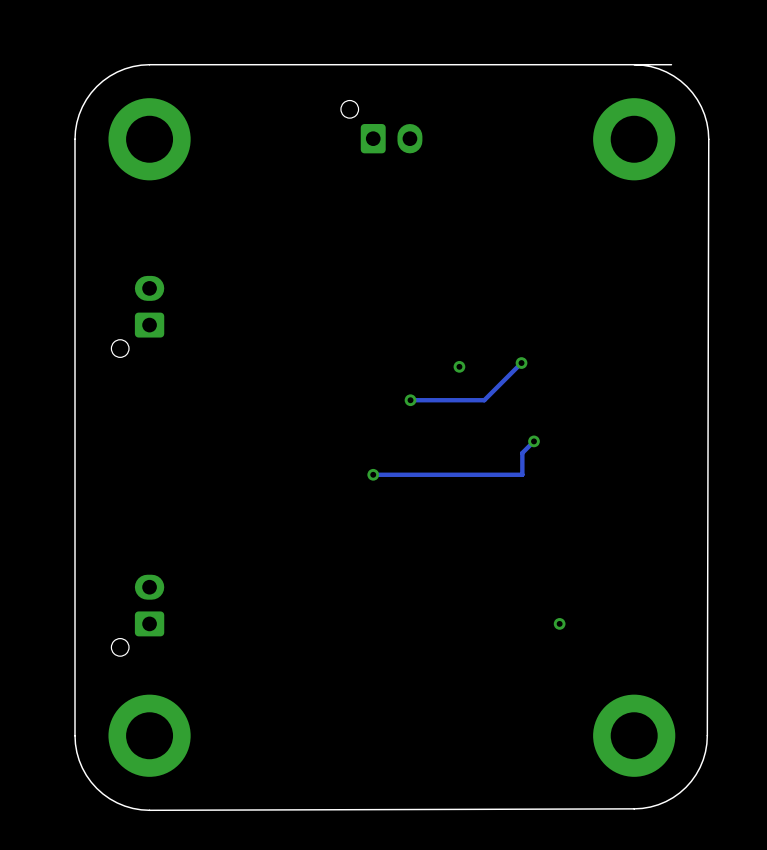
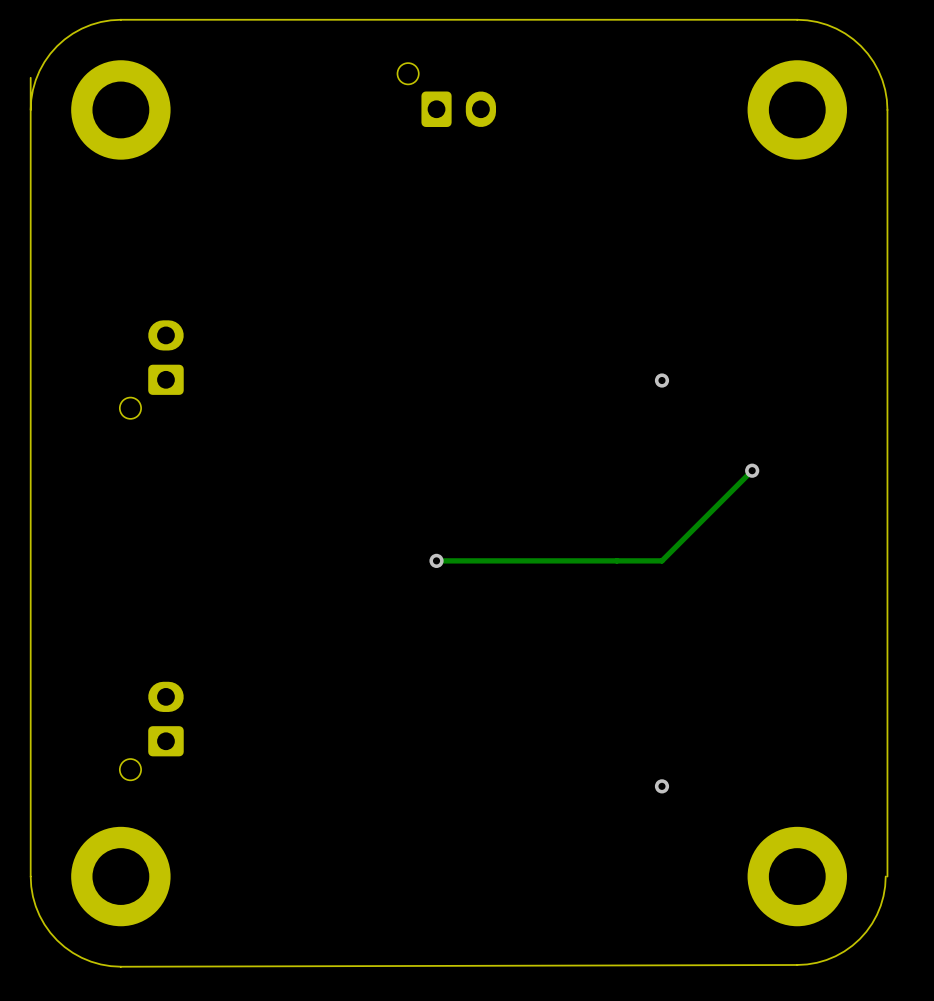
board edge: (671, 64) (149, 64) (132, 66) (117, 72) (103, 80) (91, 92) (79, 114) (75, 139) (75, 735) (76, 752) (82, 768) (91, 782) (103, 794) (124, 806) (149, 810) (634, 808) (650, 807) (665, 801) (679, 792) (691, 781) (703, 759) (707, 735) (708, 130) (701, 106) (692, 92) (680, 80) (658, 68) (642, 65) (634, 64) -> none
board edge: none -> (30, 77) (30, 876) (35, 906) (44, 924) (57, 940) (81, 957) (100, 964) (120, 966) (807, 964) (835, 956) (859, 939) (876, 914) (883, 896) (885, 876)
board edge: none -> (30, 109) (35, 80) (50, 53) (72, 33) (91, 24) (110, 20) (797, 19) (827, 24) (845, 33) (861, 46) (873, 61) (882, 80) (887, 109) (887, 876)
part position: (381, 126) -> (446, 95)
part position: (149, 139) -> (120, 109)
part position: (634, 139) -> (797, 109)
track: (521, 363) (484, 400) (410, 400) -> none
via position: (521, 363) -> (661, 380)
via: (459, 366) -> none
via: (410, 400) -> none
via: none -> (752, 470)
track: (533, 441) (522, 453) (522, 474) -> (752, 470) (661, 560) (616, 560)
via: (533, 441) -> none
via position: (559, 623) -> (661, 786)
part position: (149, 735) -> (120, 876)
part position: (634, 735) -> (797, 876)

